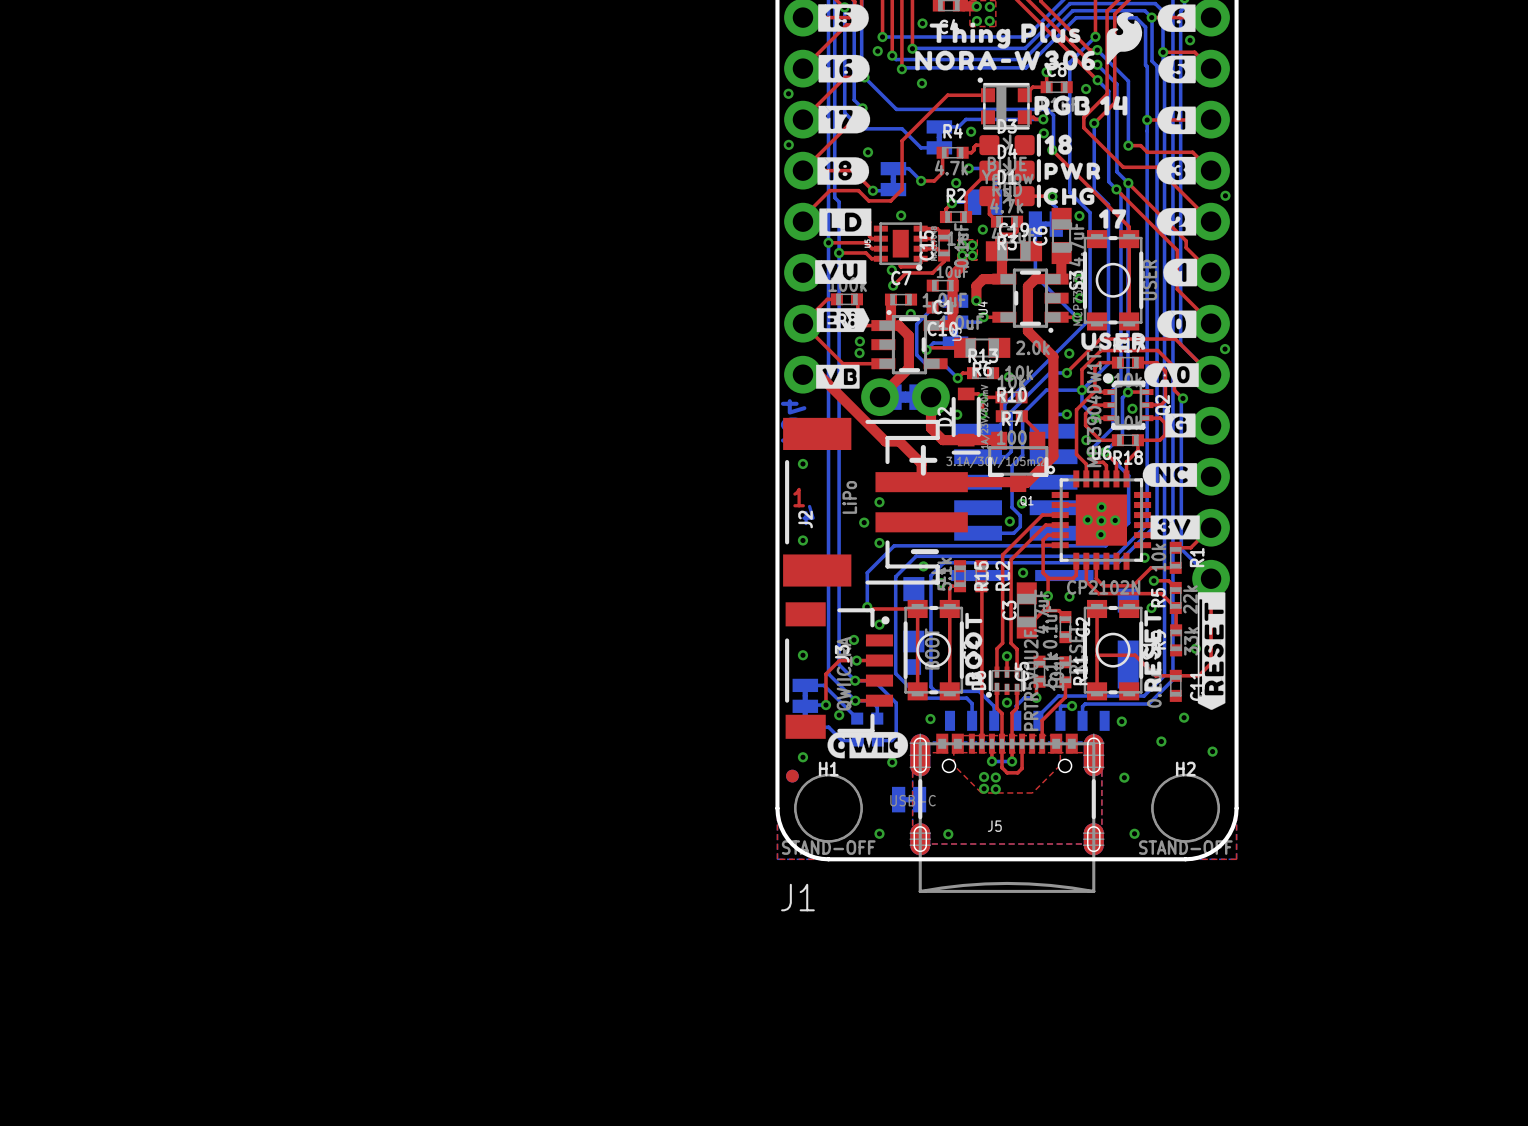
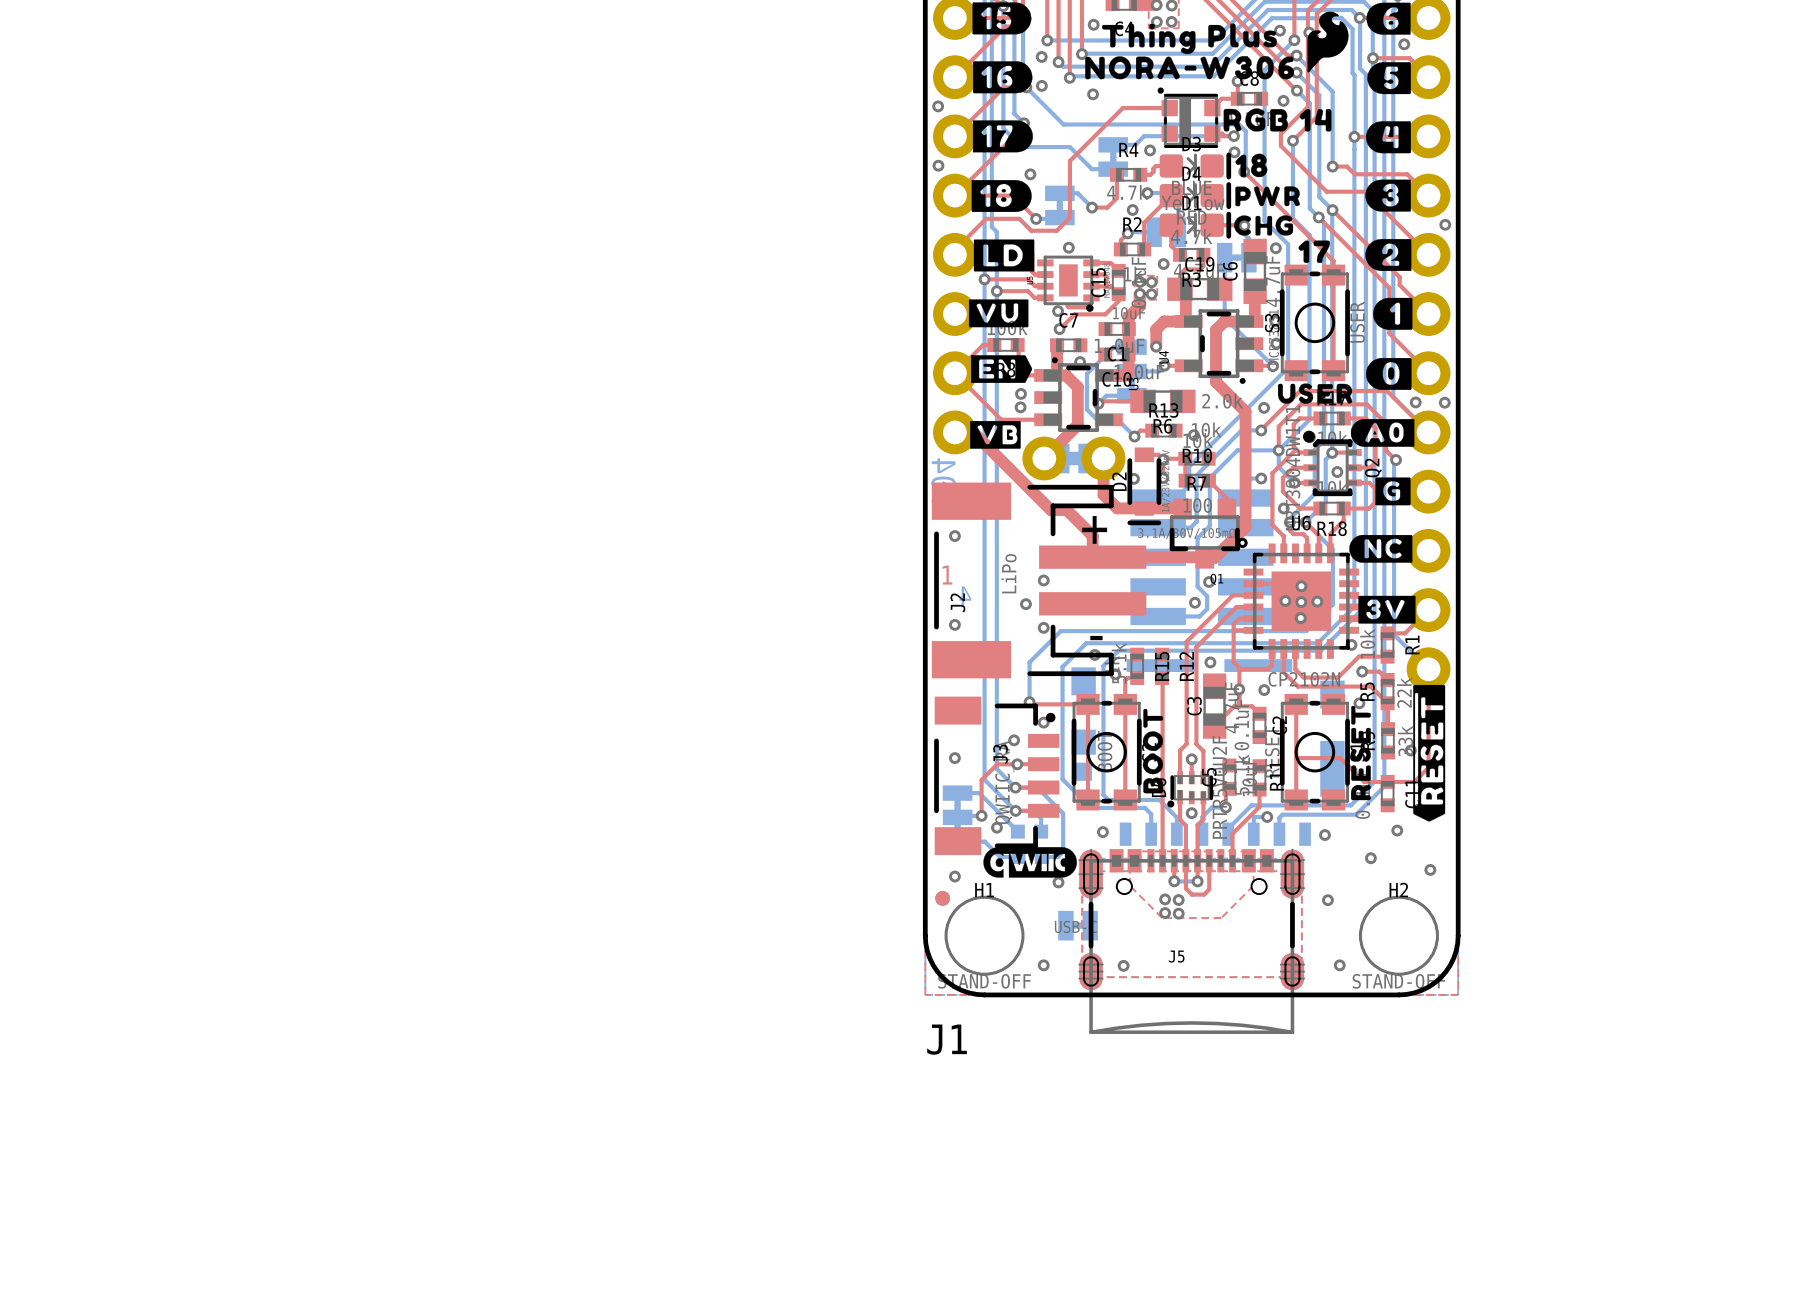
via: none -> (1279, 30)
via: none -> (1309, 32)
via: none -> (1041, 85)
via: none -> (1415, 402)

